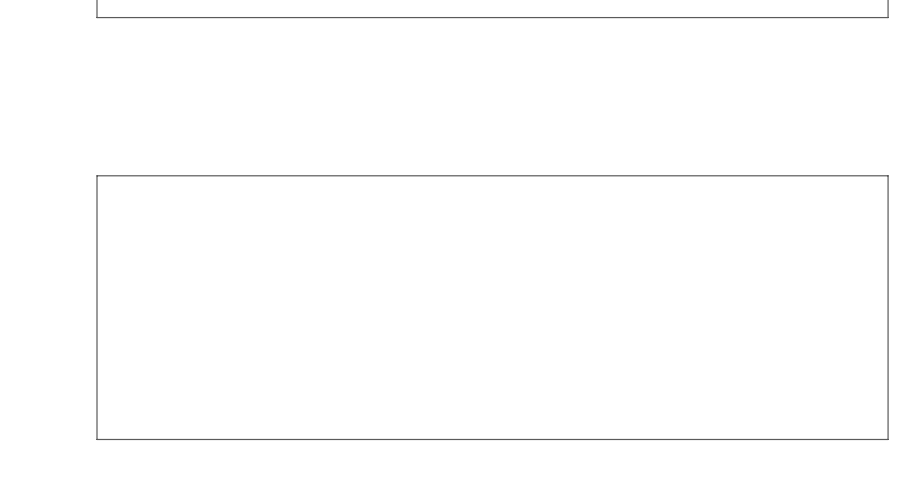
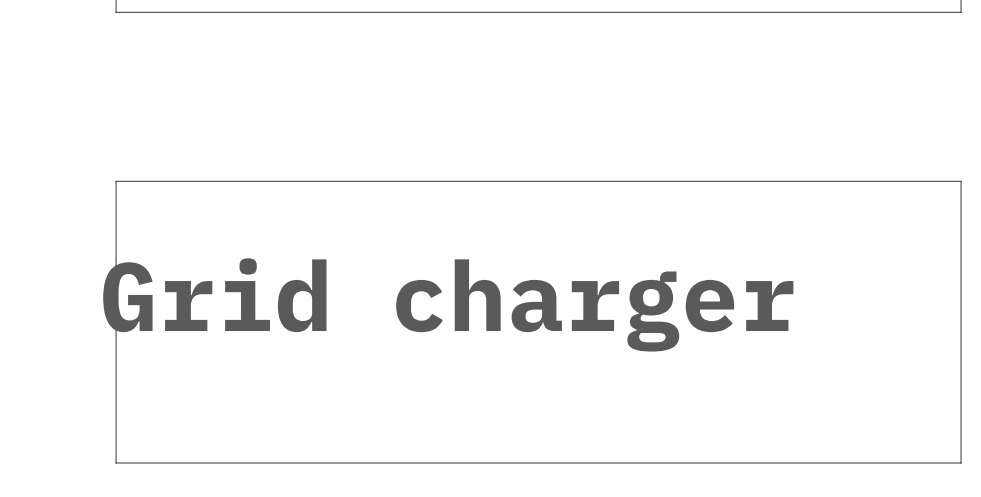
text: none -> Grid charger (448, 304)

